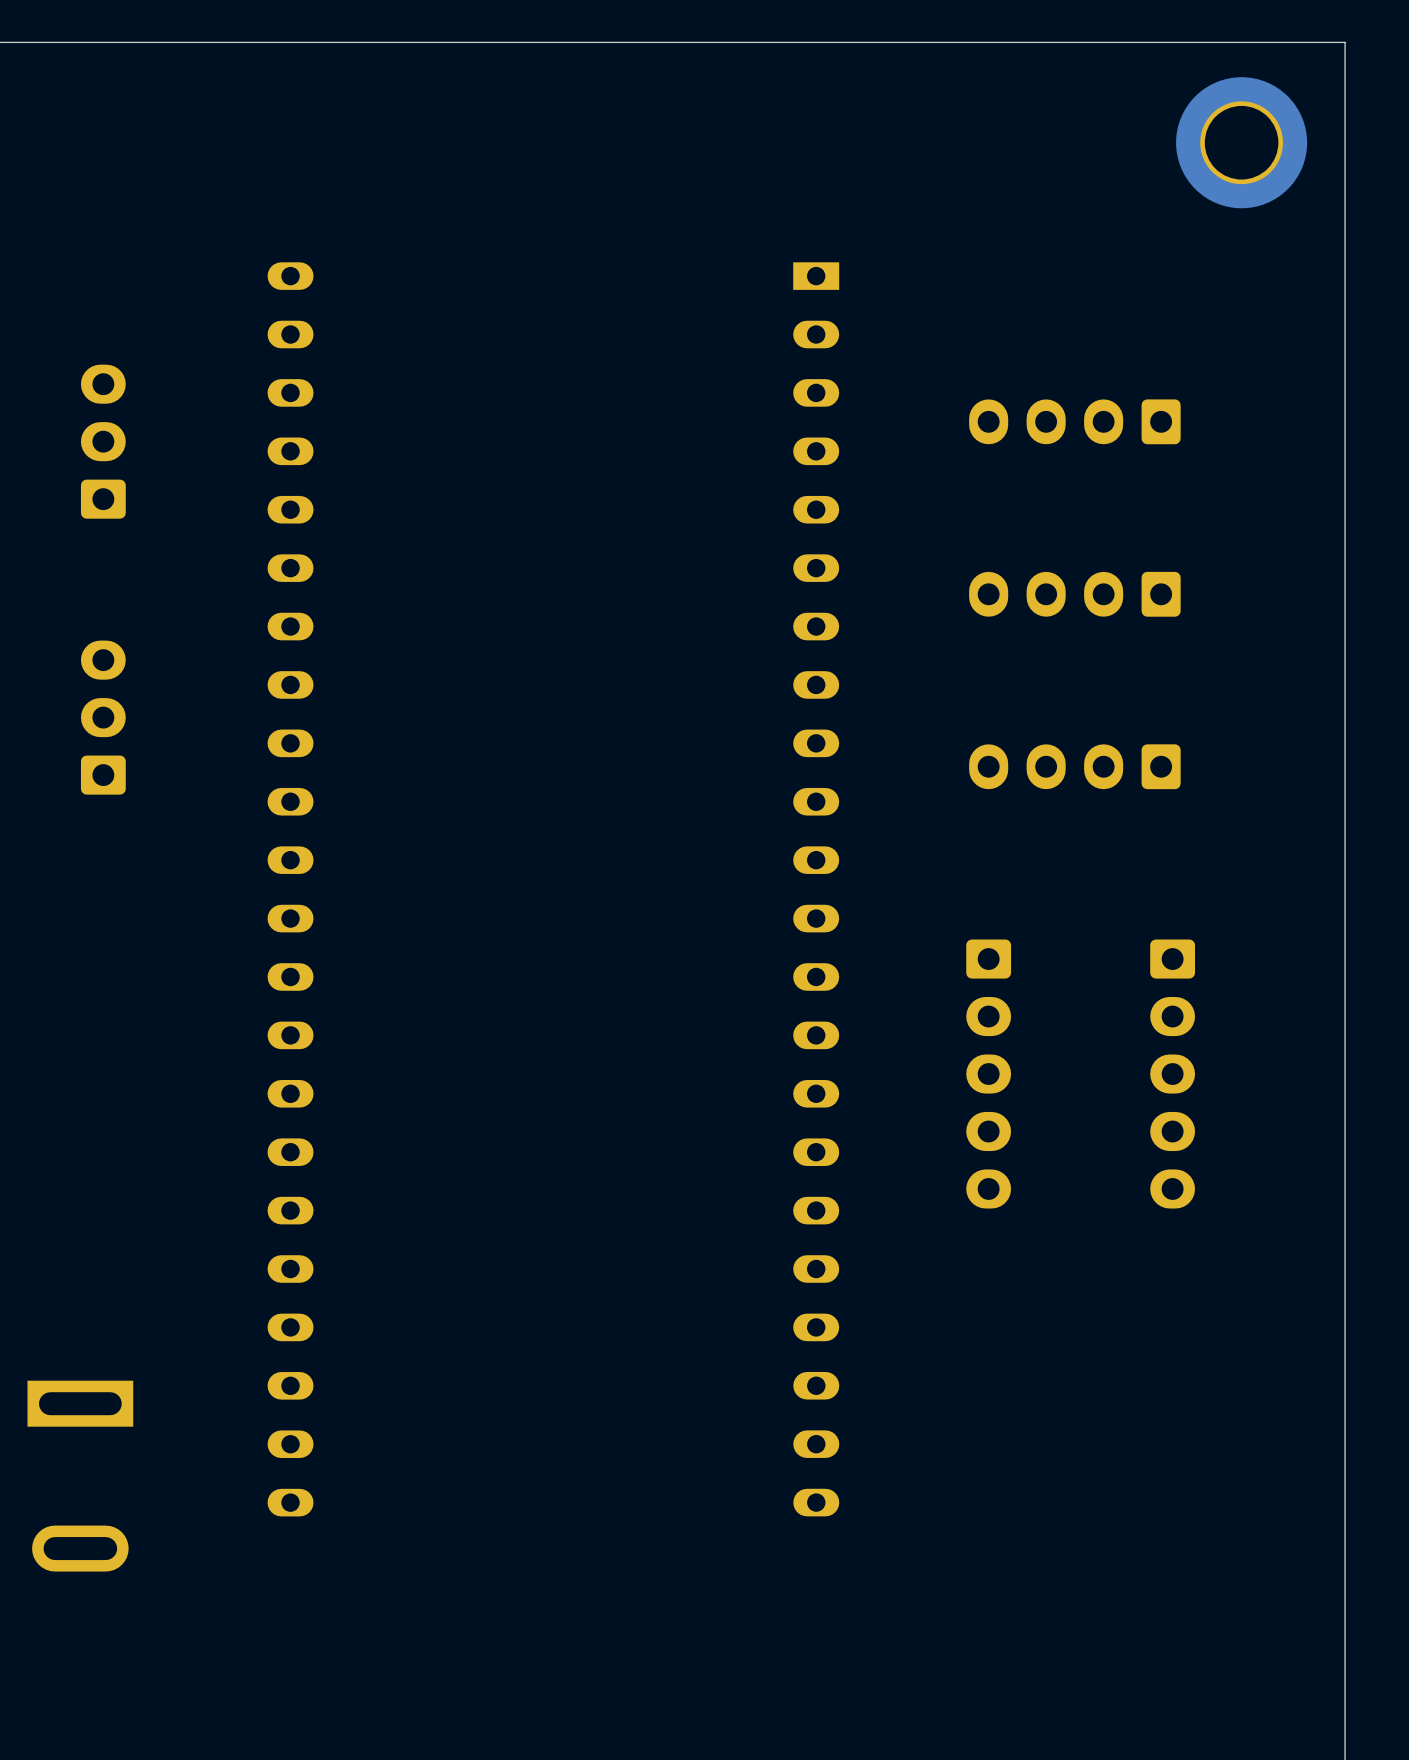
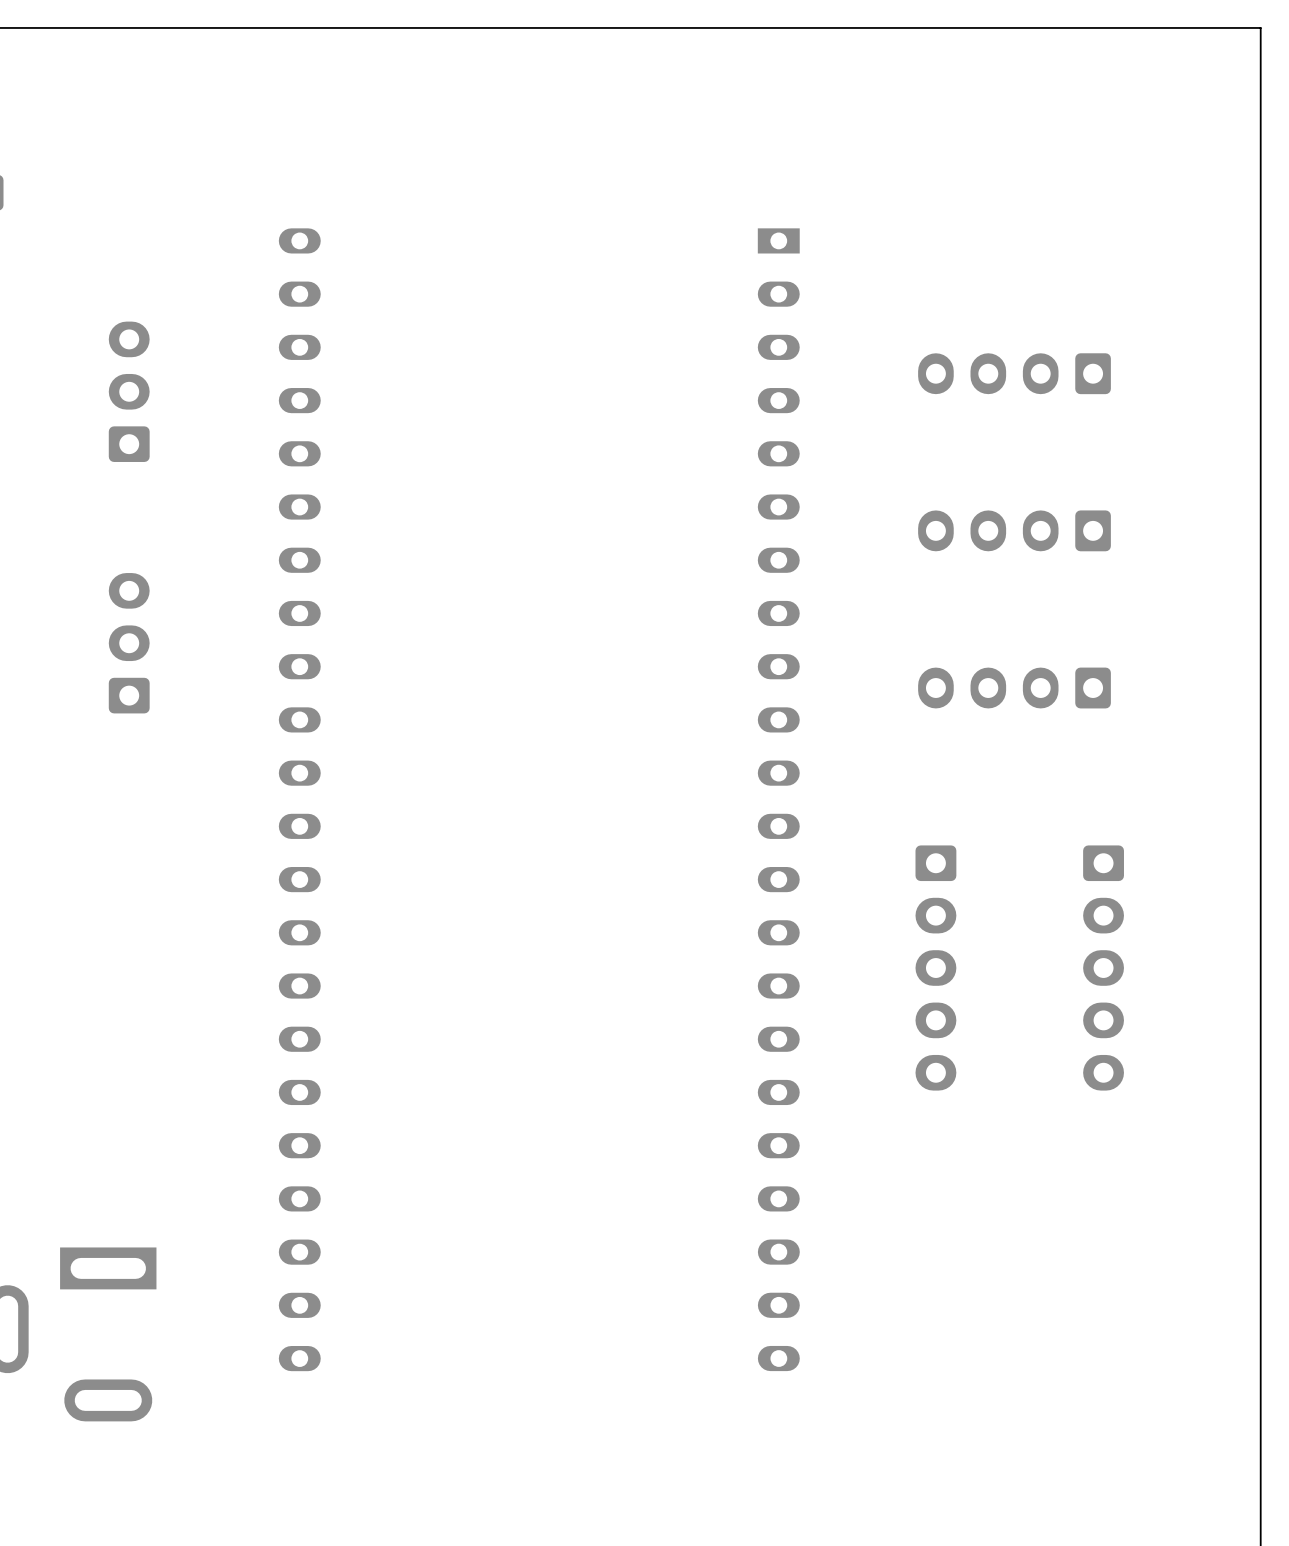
part: (1241, 142) -> none

